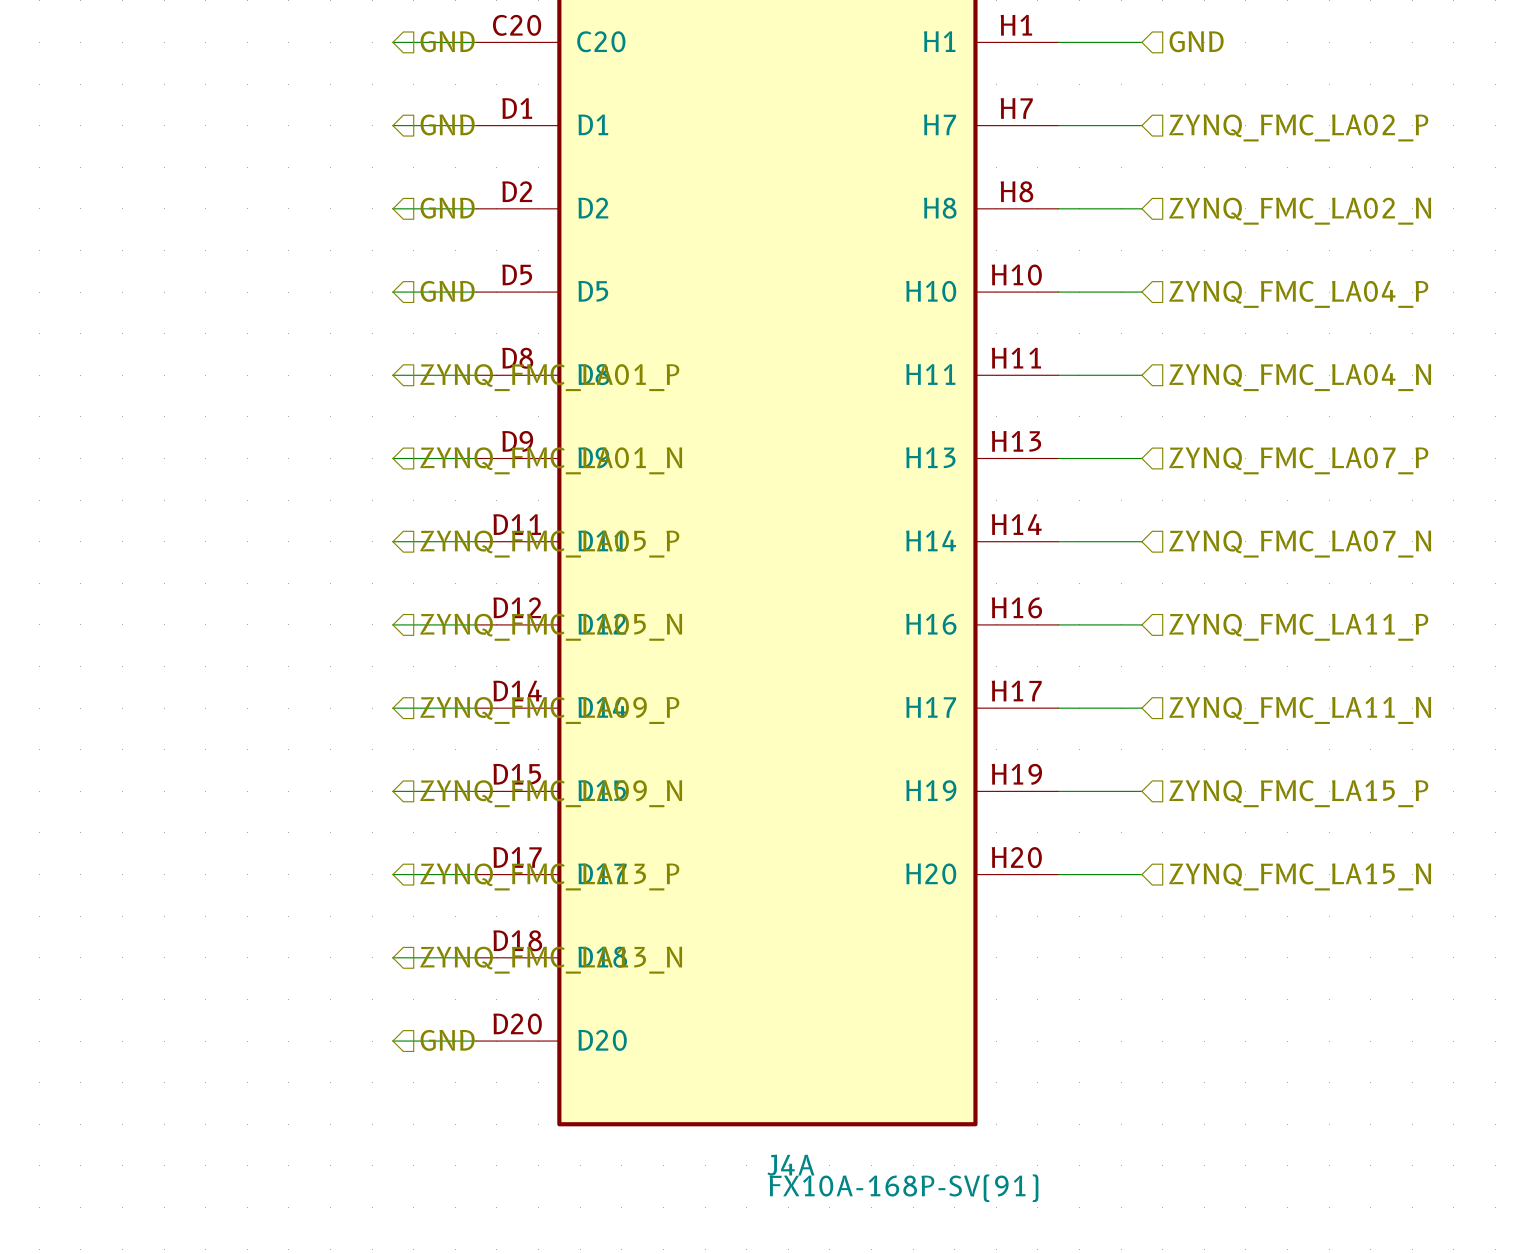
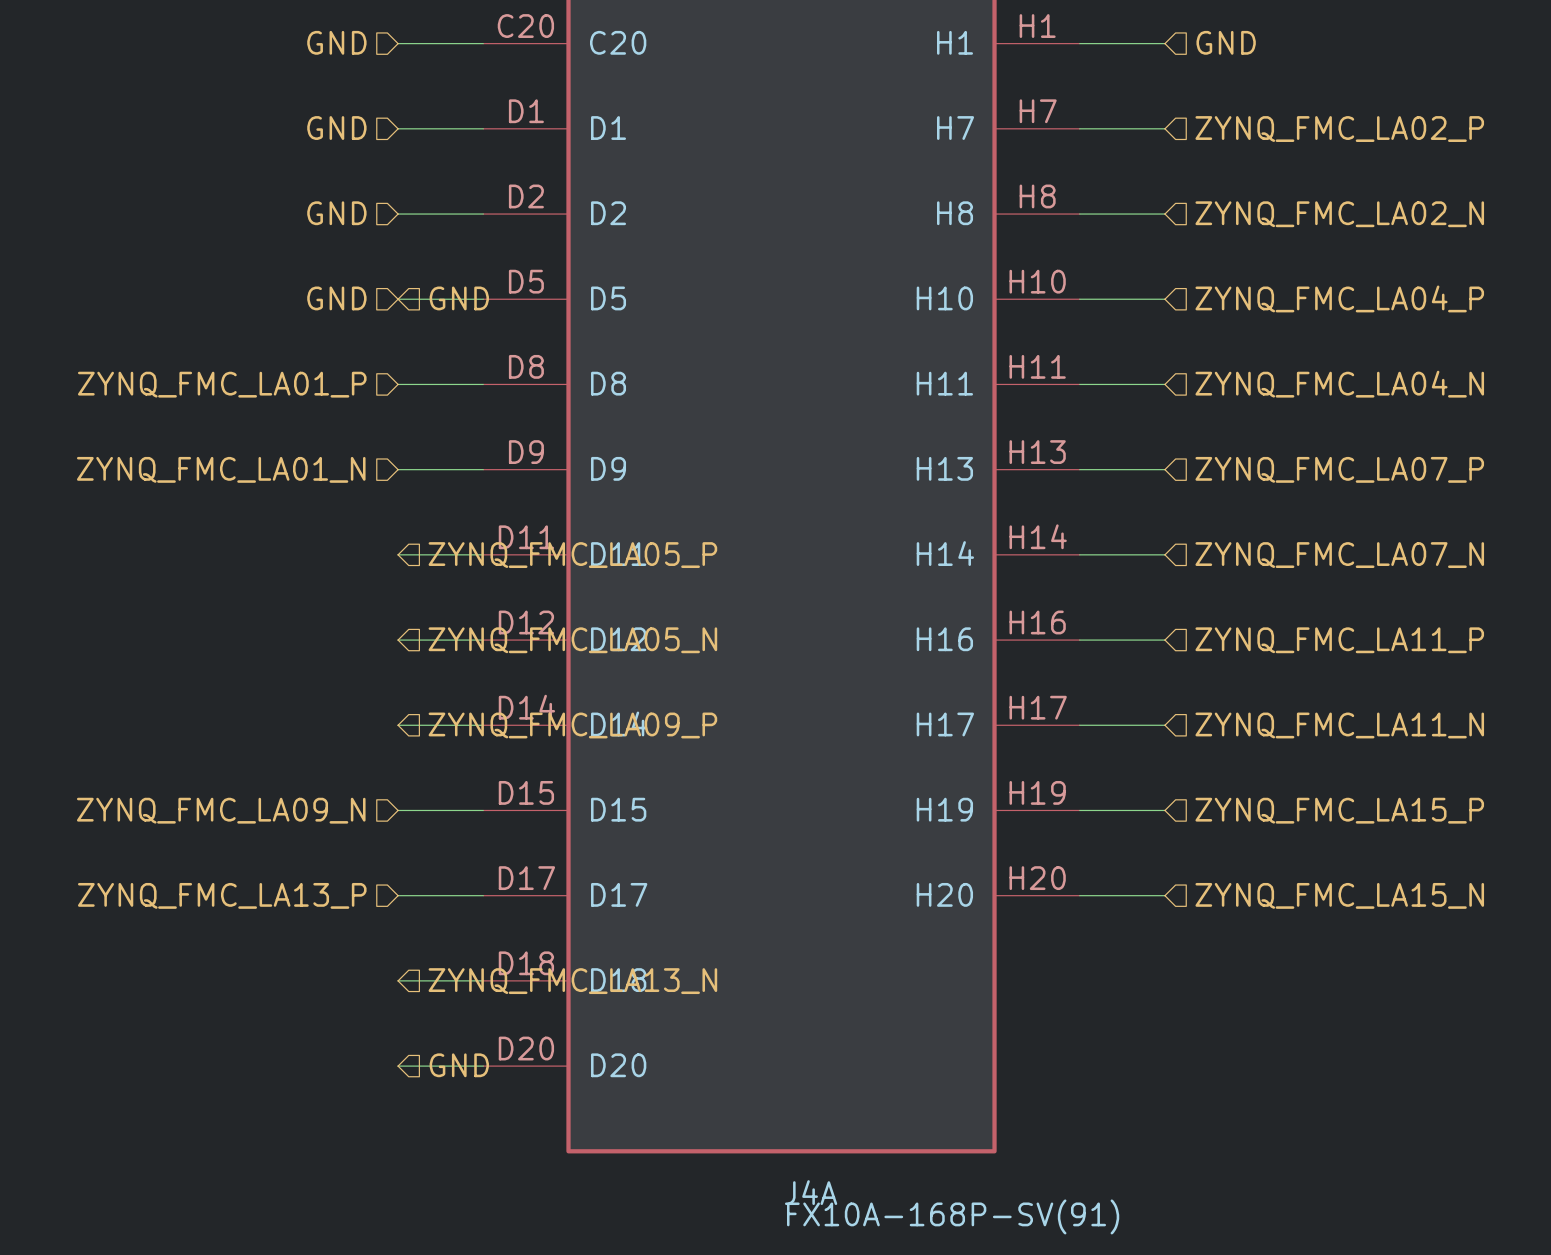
hierarchical label: none -> GND (336, 42)
hierarchical label: GND (447, 41) -> none
hierarchical label: none -> GND (336, 128)
hierarchical label: GND (447, 124) -> none
hierarchical label: none -> GND (336, 213)
hierarchical label: GND (447, 208) -> none
hierarchical label: none -> GND (336, 298)
hierarchical label rotation: 0° (549, 377) -> 180° (222, 384)
hierarchical label position: ZYNQ_FMC_LA01_P (549, 377) -> ZYNQ_FMC_LA01_P (222, 384)
hierarchical label rotation: 0° (551, 460) -> 180° (221, 469)
hierarchical label position: ZYNQ_FMC_LA01_N (551, 460) -> ZYNQ_FMC_LA01_N (221, 469)
hierarchical label rotation: 0° (551, 793) -> 180° (221, 810)
hierarchical label position: ZYNQ_FMC_LA09_N (551, 793) -> ZYNQ_FMC_LA09_N (221, 810)
hierarchical label rotation: 0° (549, 876) -> 180° (222, 895)
hierarchical label position: ZYNQ_FMC_LA13_P (549, 876) -> ZYNQ_FMC_LA13_P (222, 895)

